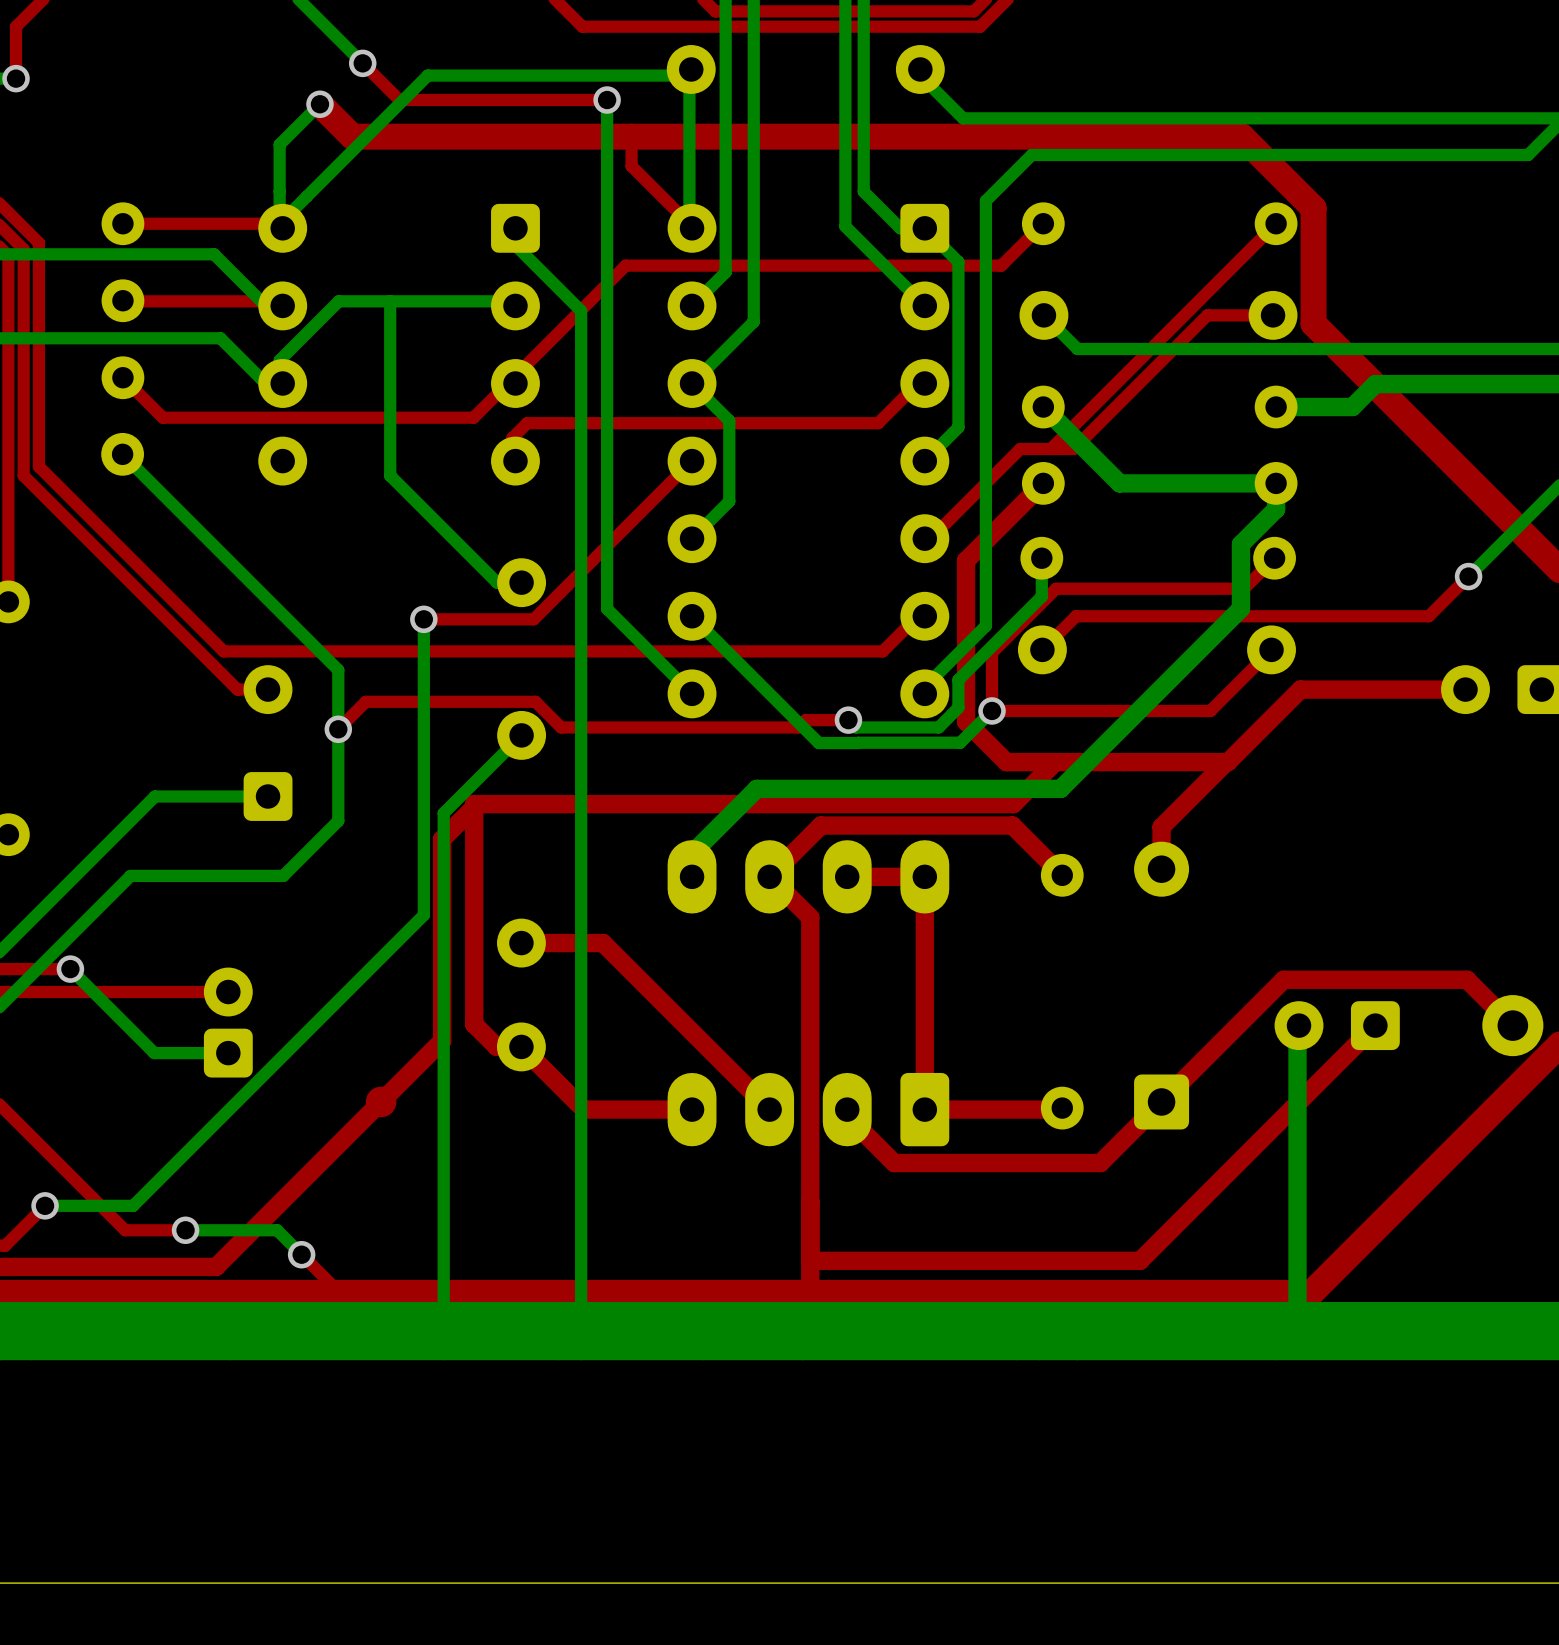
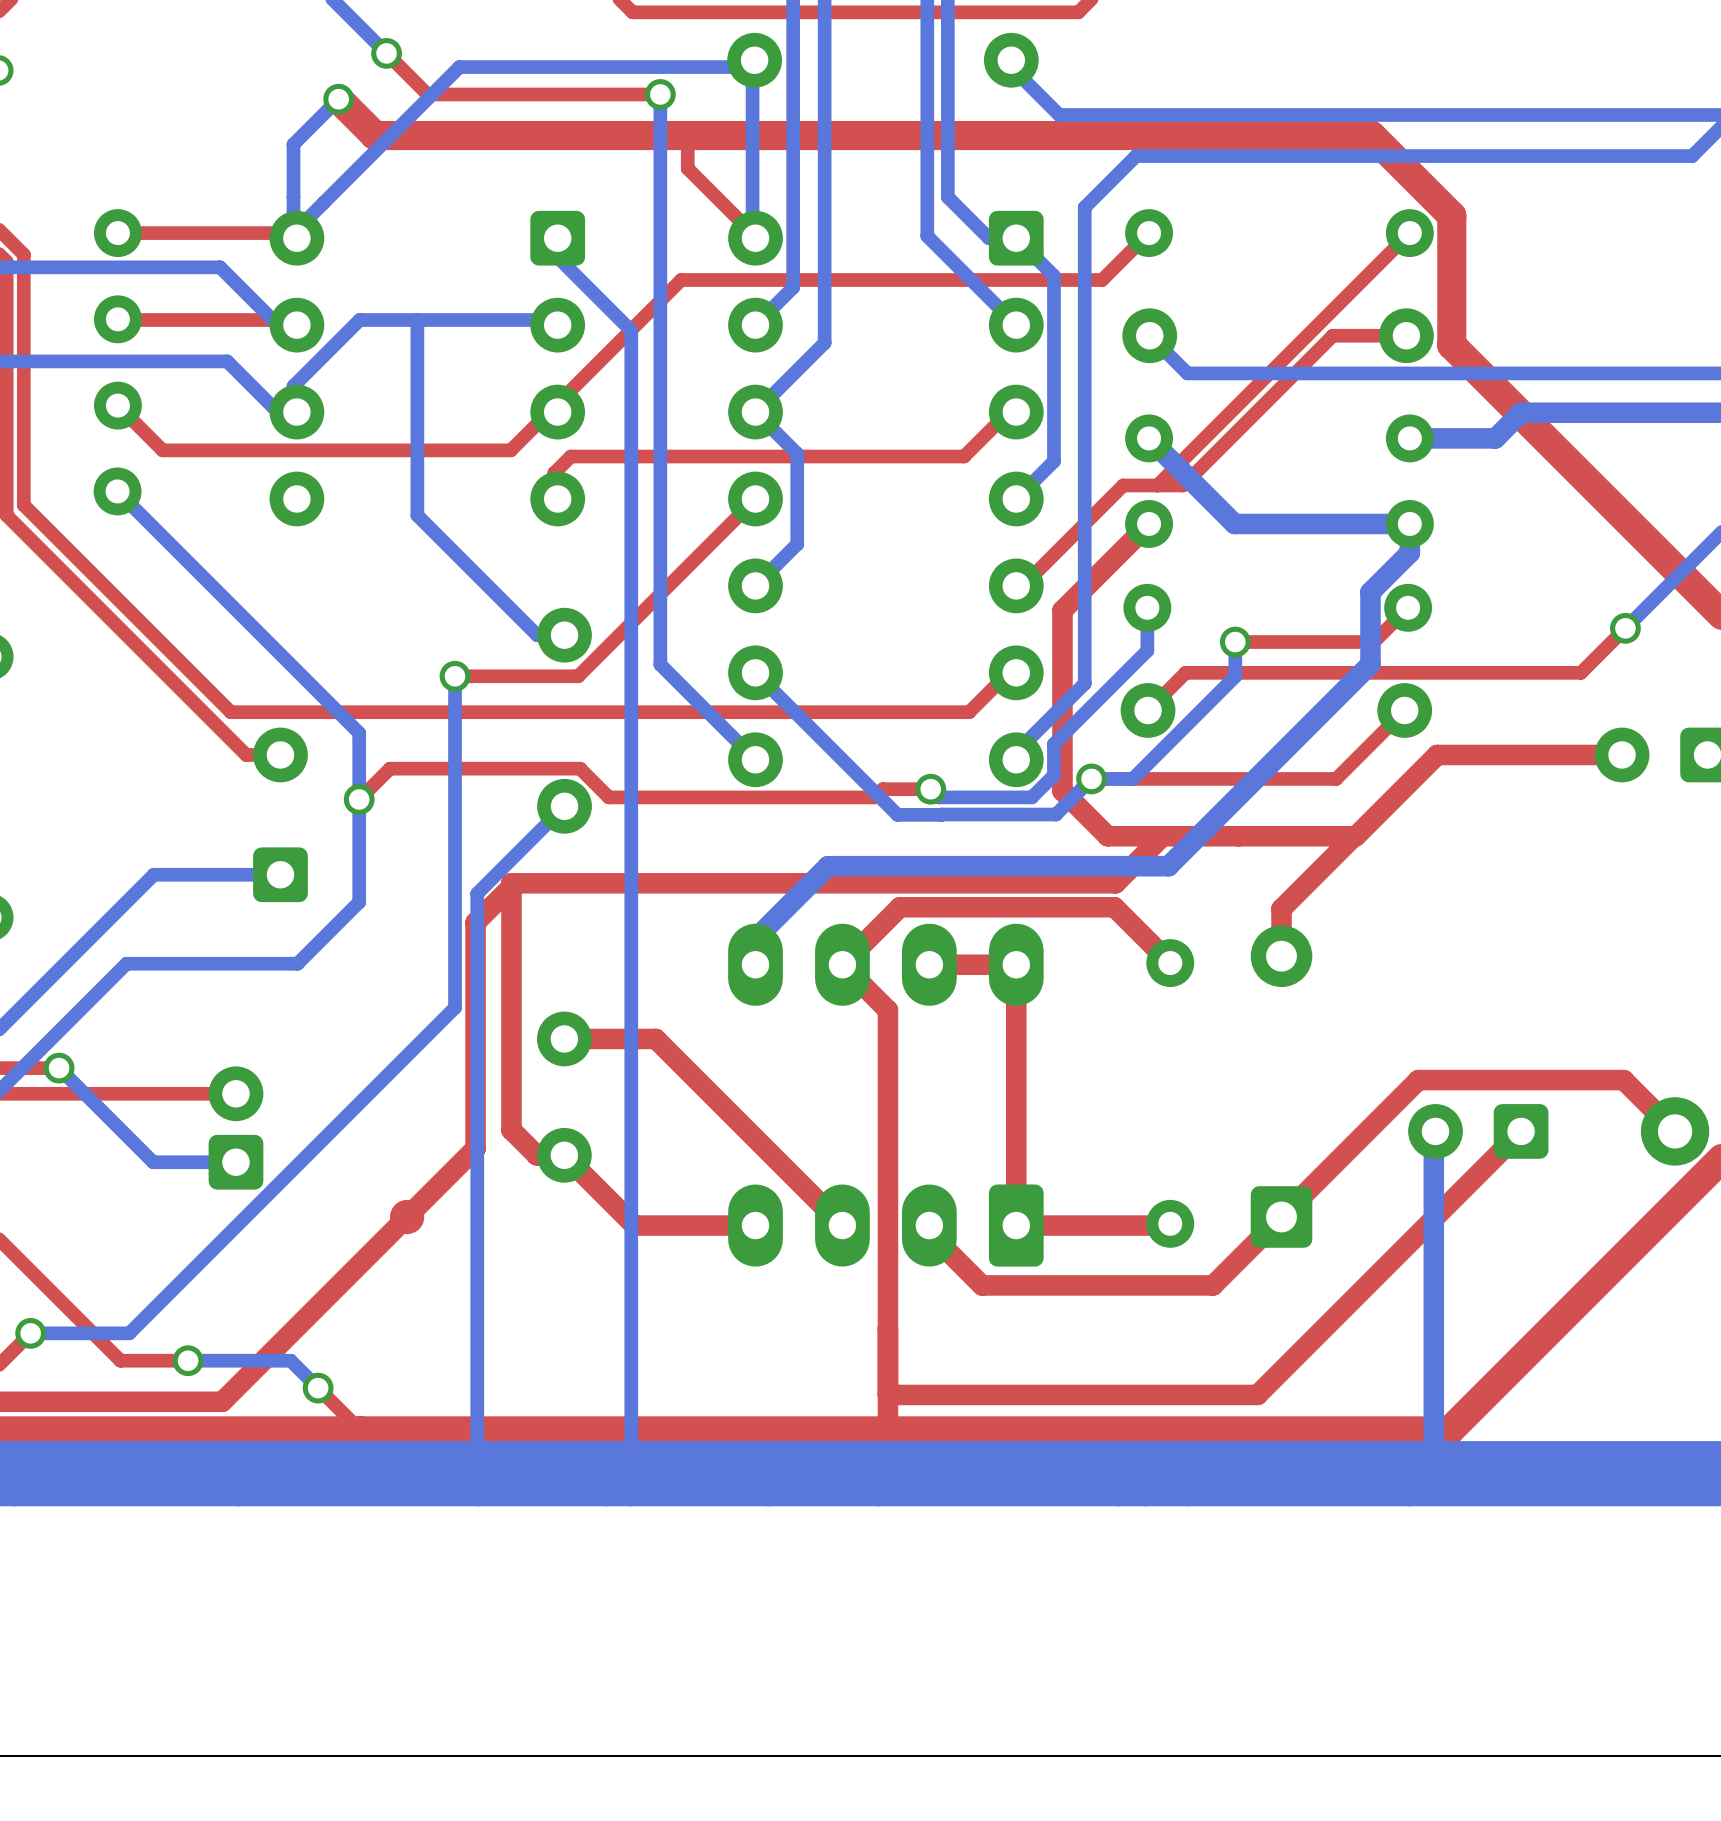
top track: (1120, 588) (1055, 588) (992, 652) (992, 710) -> none
bottom track: none -> (1235, 642) (1235, 676) (1132, 778) (1091, 778)
via: none -> (1235, 642)

